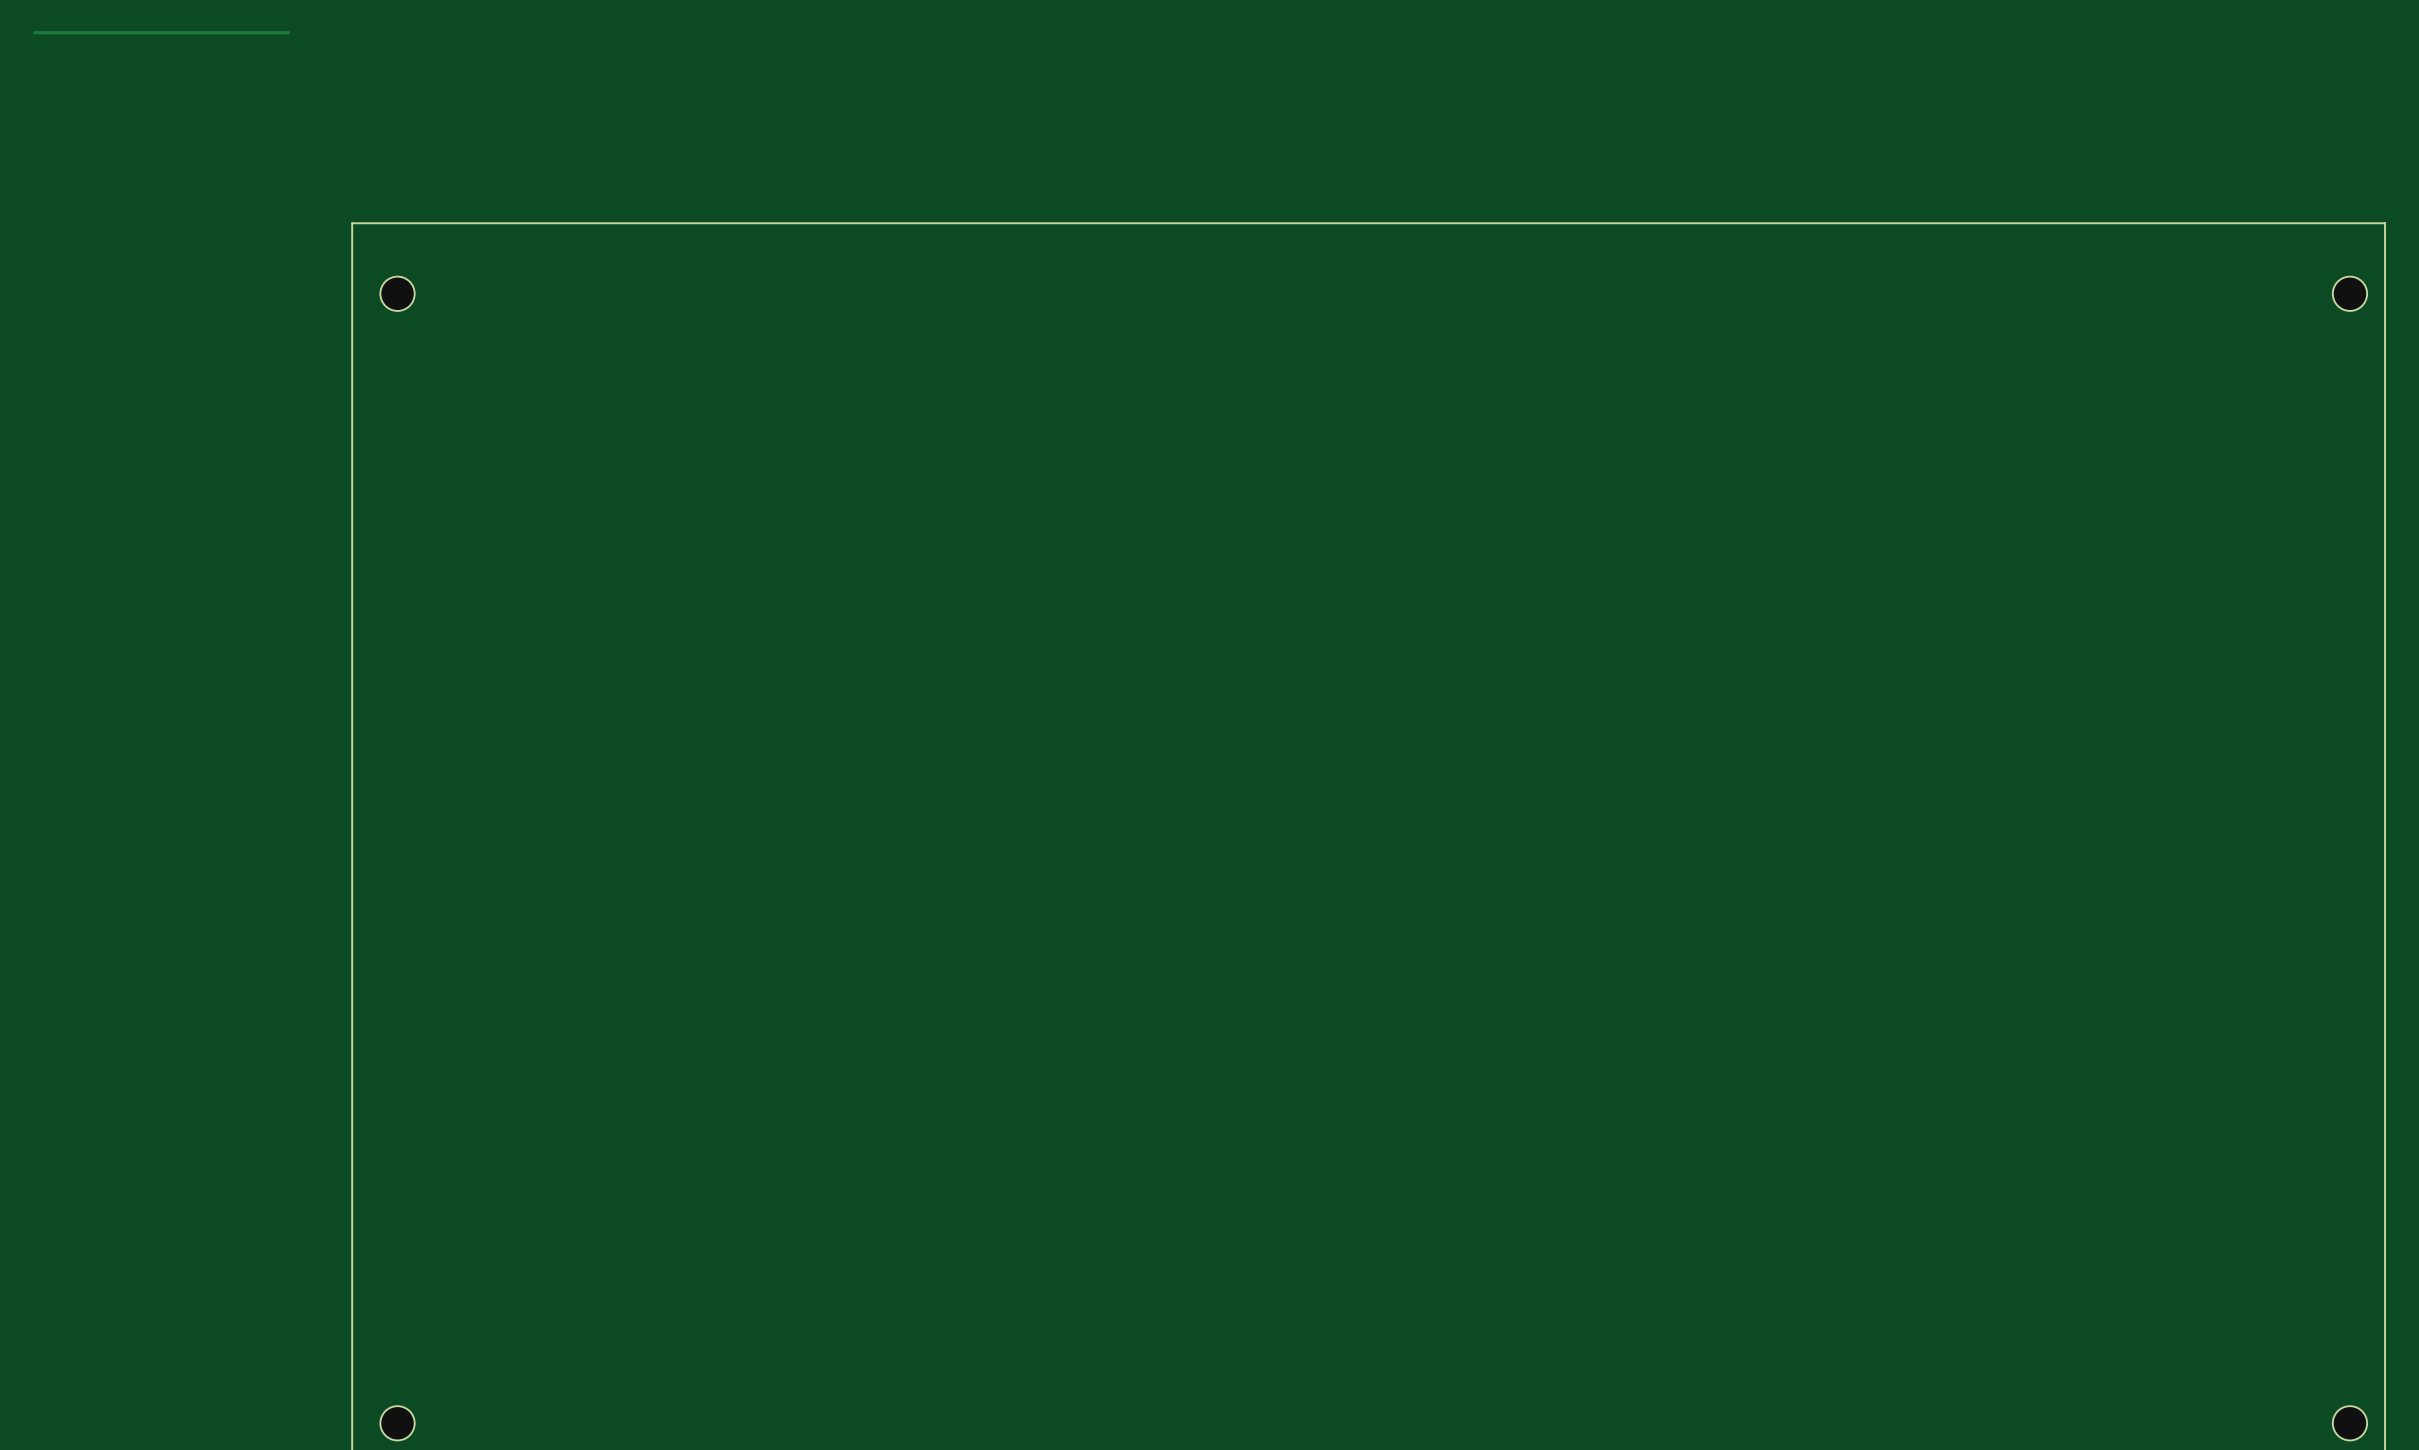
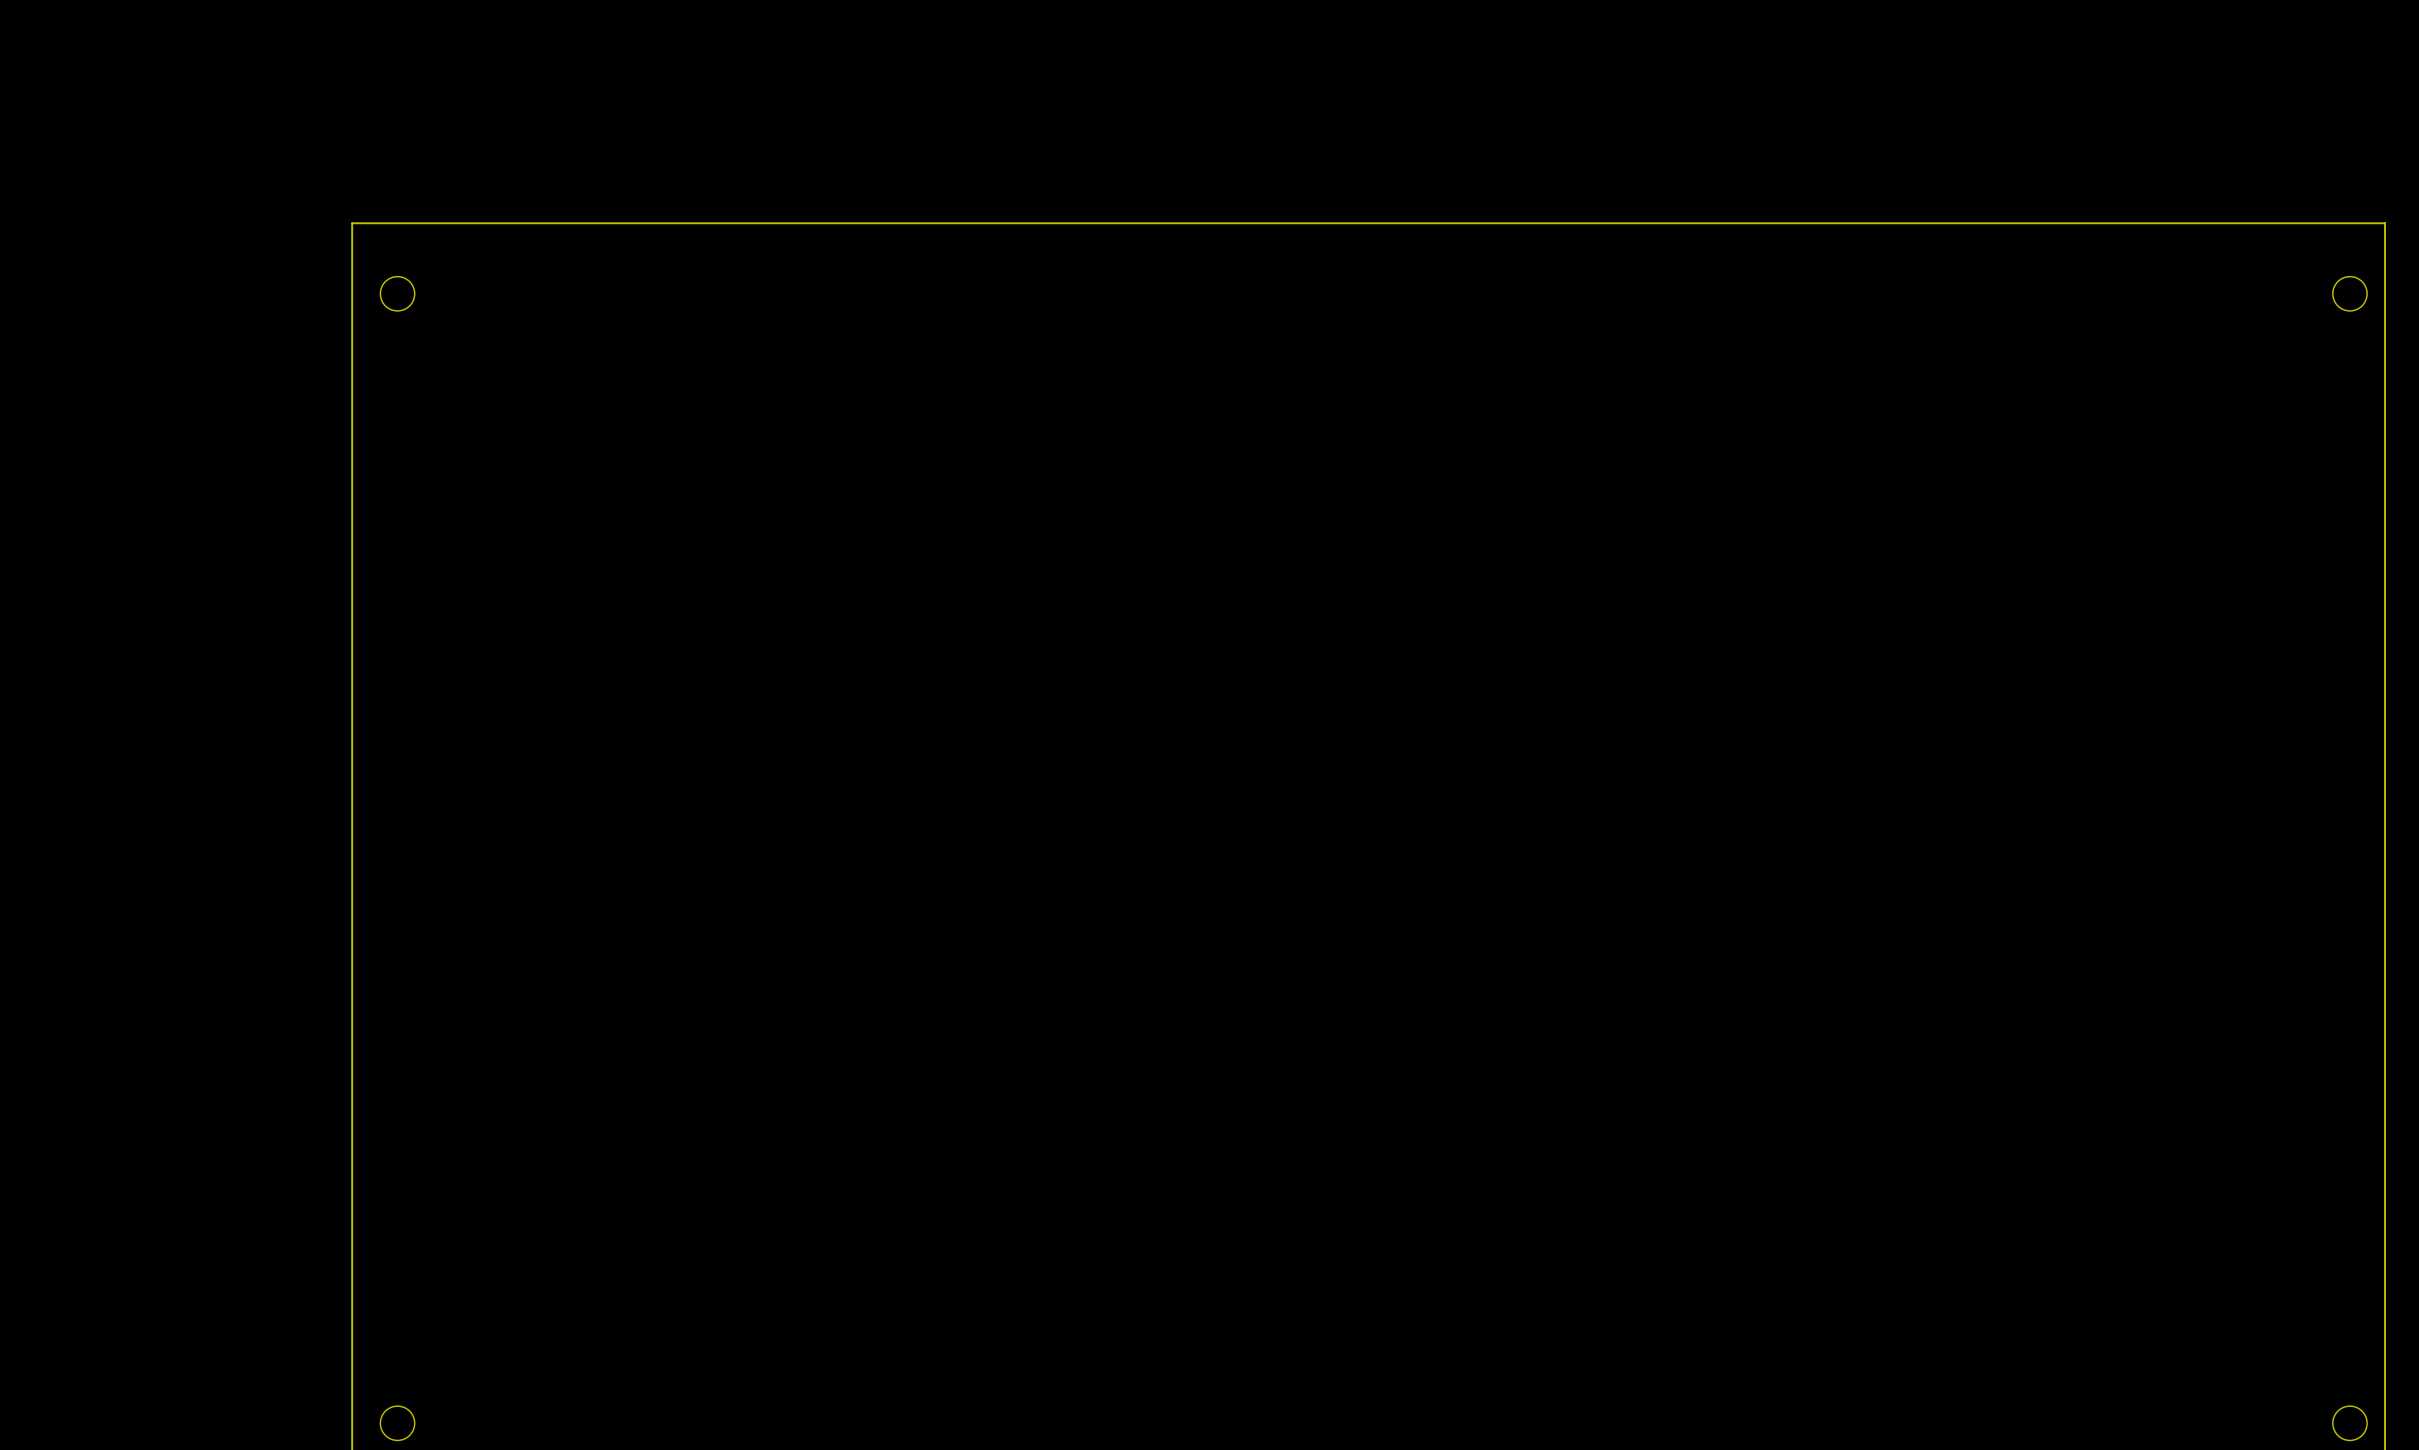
track: (34, 32) (288, 32) -> none

